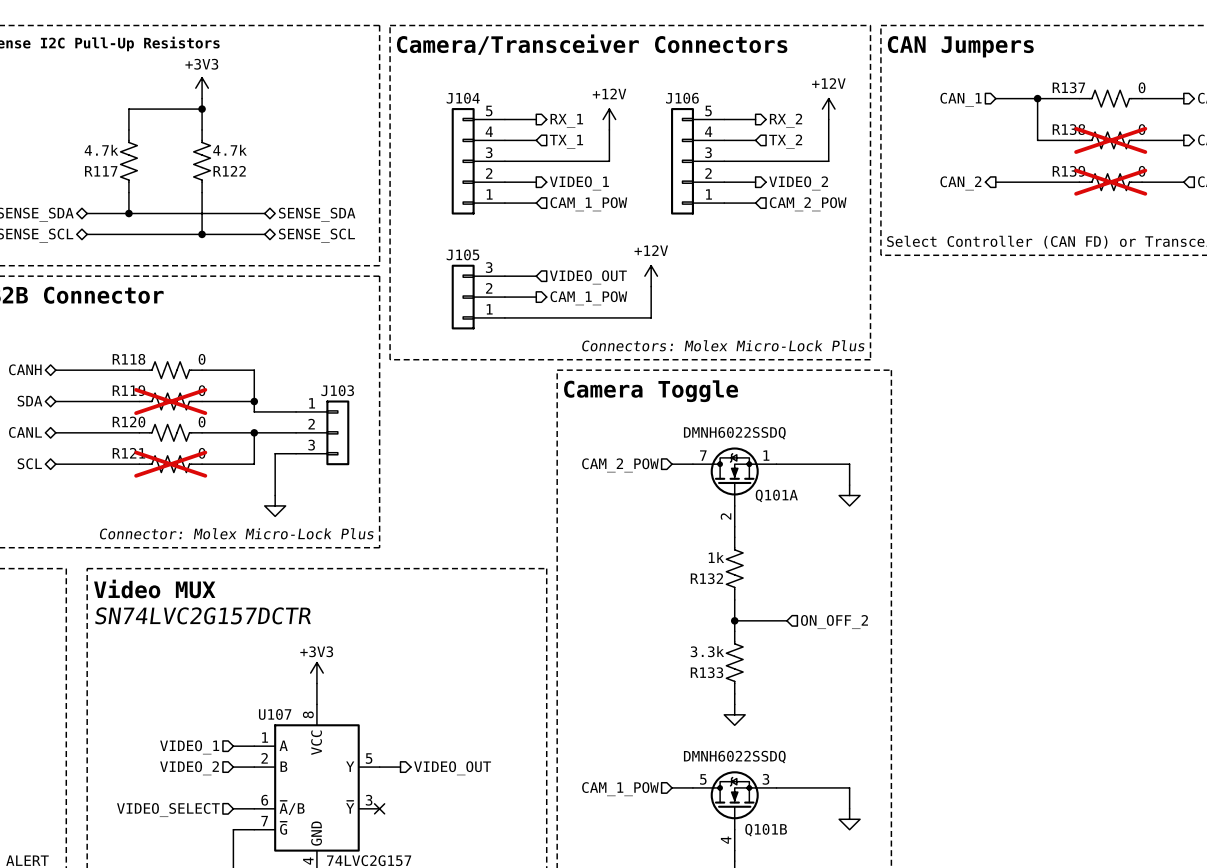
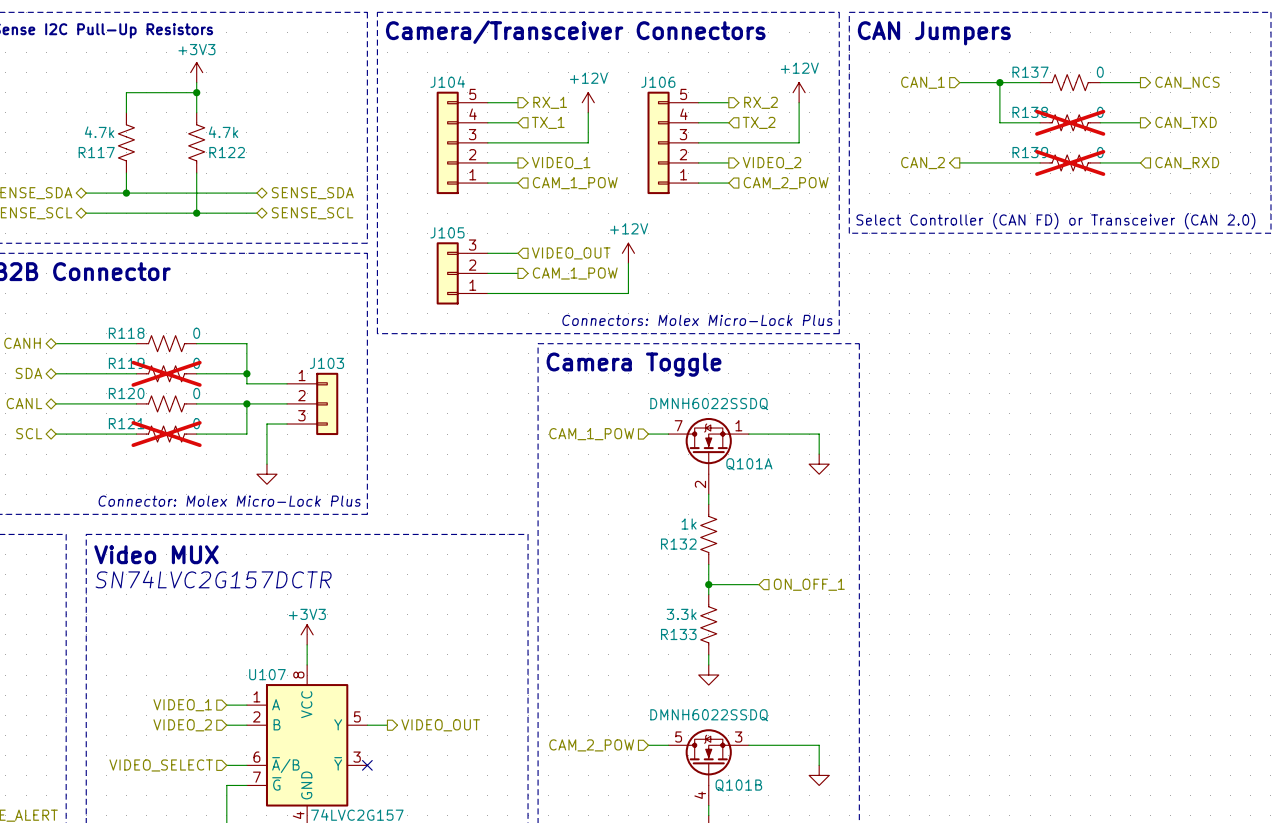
hierarchical label: CAM_2_POW (620, 465) -> CAM_1_POW (591, 434)
hierarchical label: ON_OFF_2 (834, 622) -> ON_OFF_1 (809, 584)
hierarchical label: CAM_1_POW (620, 789) -> CAM_2_POW (591, 745)

